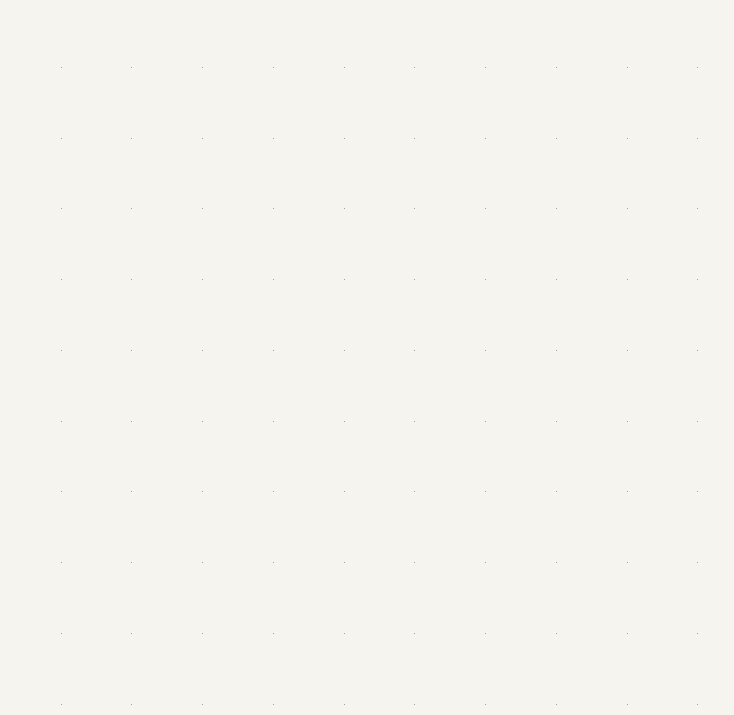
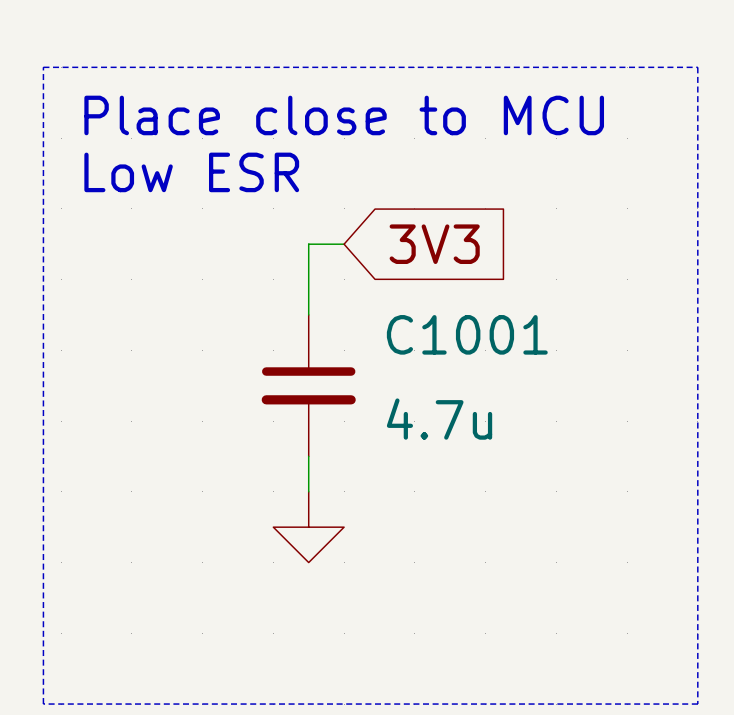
line: none -> (43, 67) (697, 67) (697, 704) (43, 704) (43, 67)
text: none -> Place close to MCU (344, 115)
text: none -> Low ESR (191, 172)
wire: none -> (344, 244) (308, 244) (308, 314)
global label: none -> 3V3 (434, 244)
C1001: none -> 4.7u (308, 385)
wire: none -> (308, 456) (308, 491)
power symbol: none -> (308, 527)

